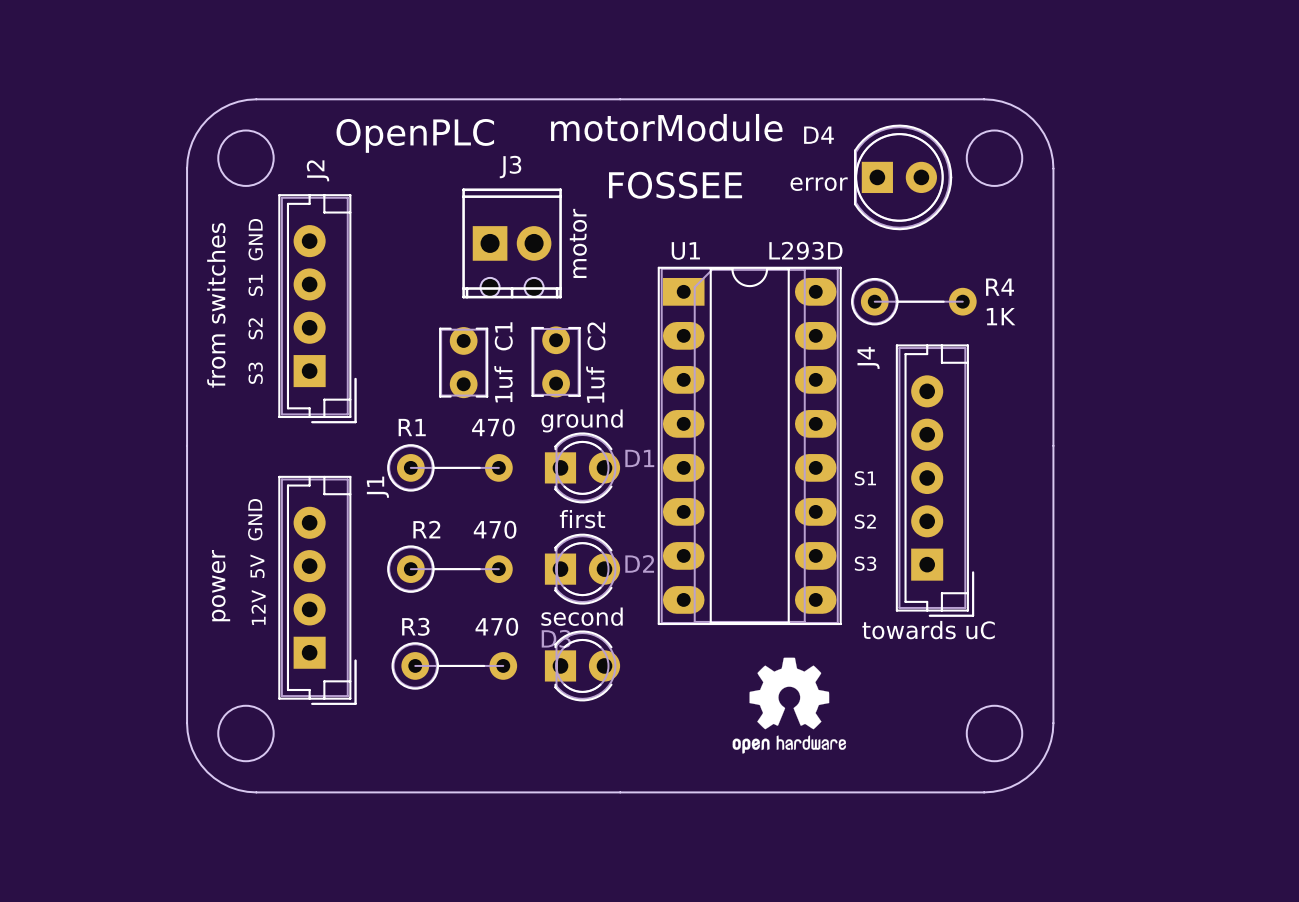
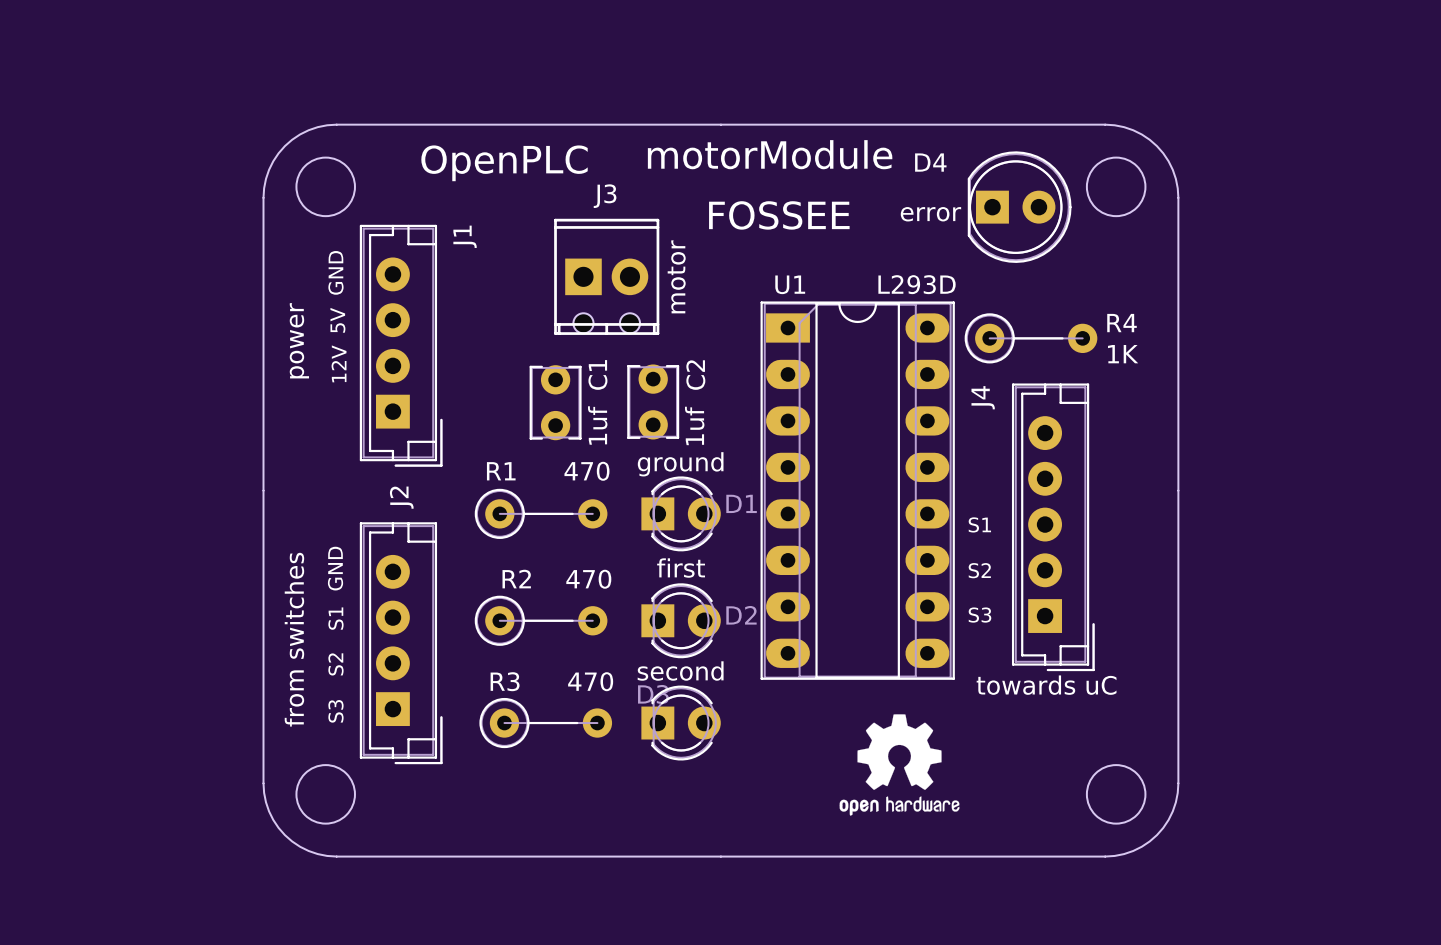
J2 name: J2 (317, 170) -> J1 (465, 236)
text: S1 (255, 285) -> 5V (337, 320)
J2 value: from switches (216, 305) -> power (299, 340)
text: S2 (255, 328) -> 12V (339, 363)
text position: S3 (255, 373) -> S3 (335, 711)
J1 name: J1 (377, 487) -> J2 (401, 497)
text: 5V (257, 566) -> S1 (335, 618)
J1 value: power (221, 585) -> from switches (294, 639)
text: 12V (258, 607) -> S2 (335, 664)

